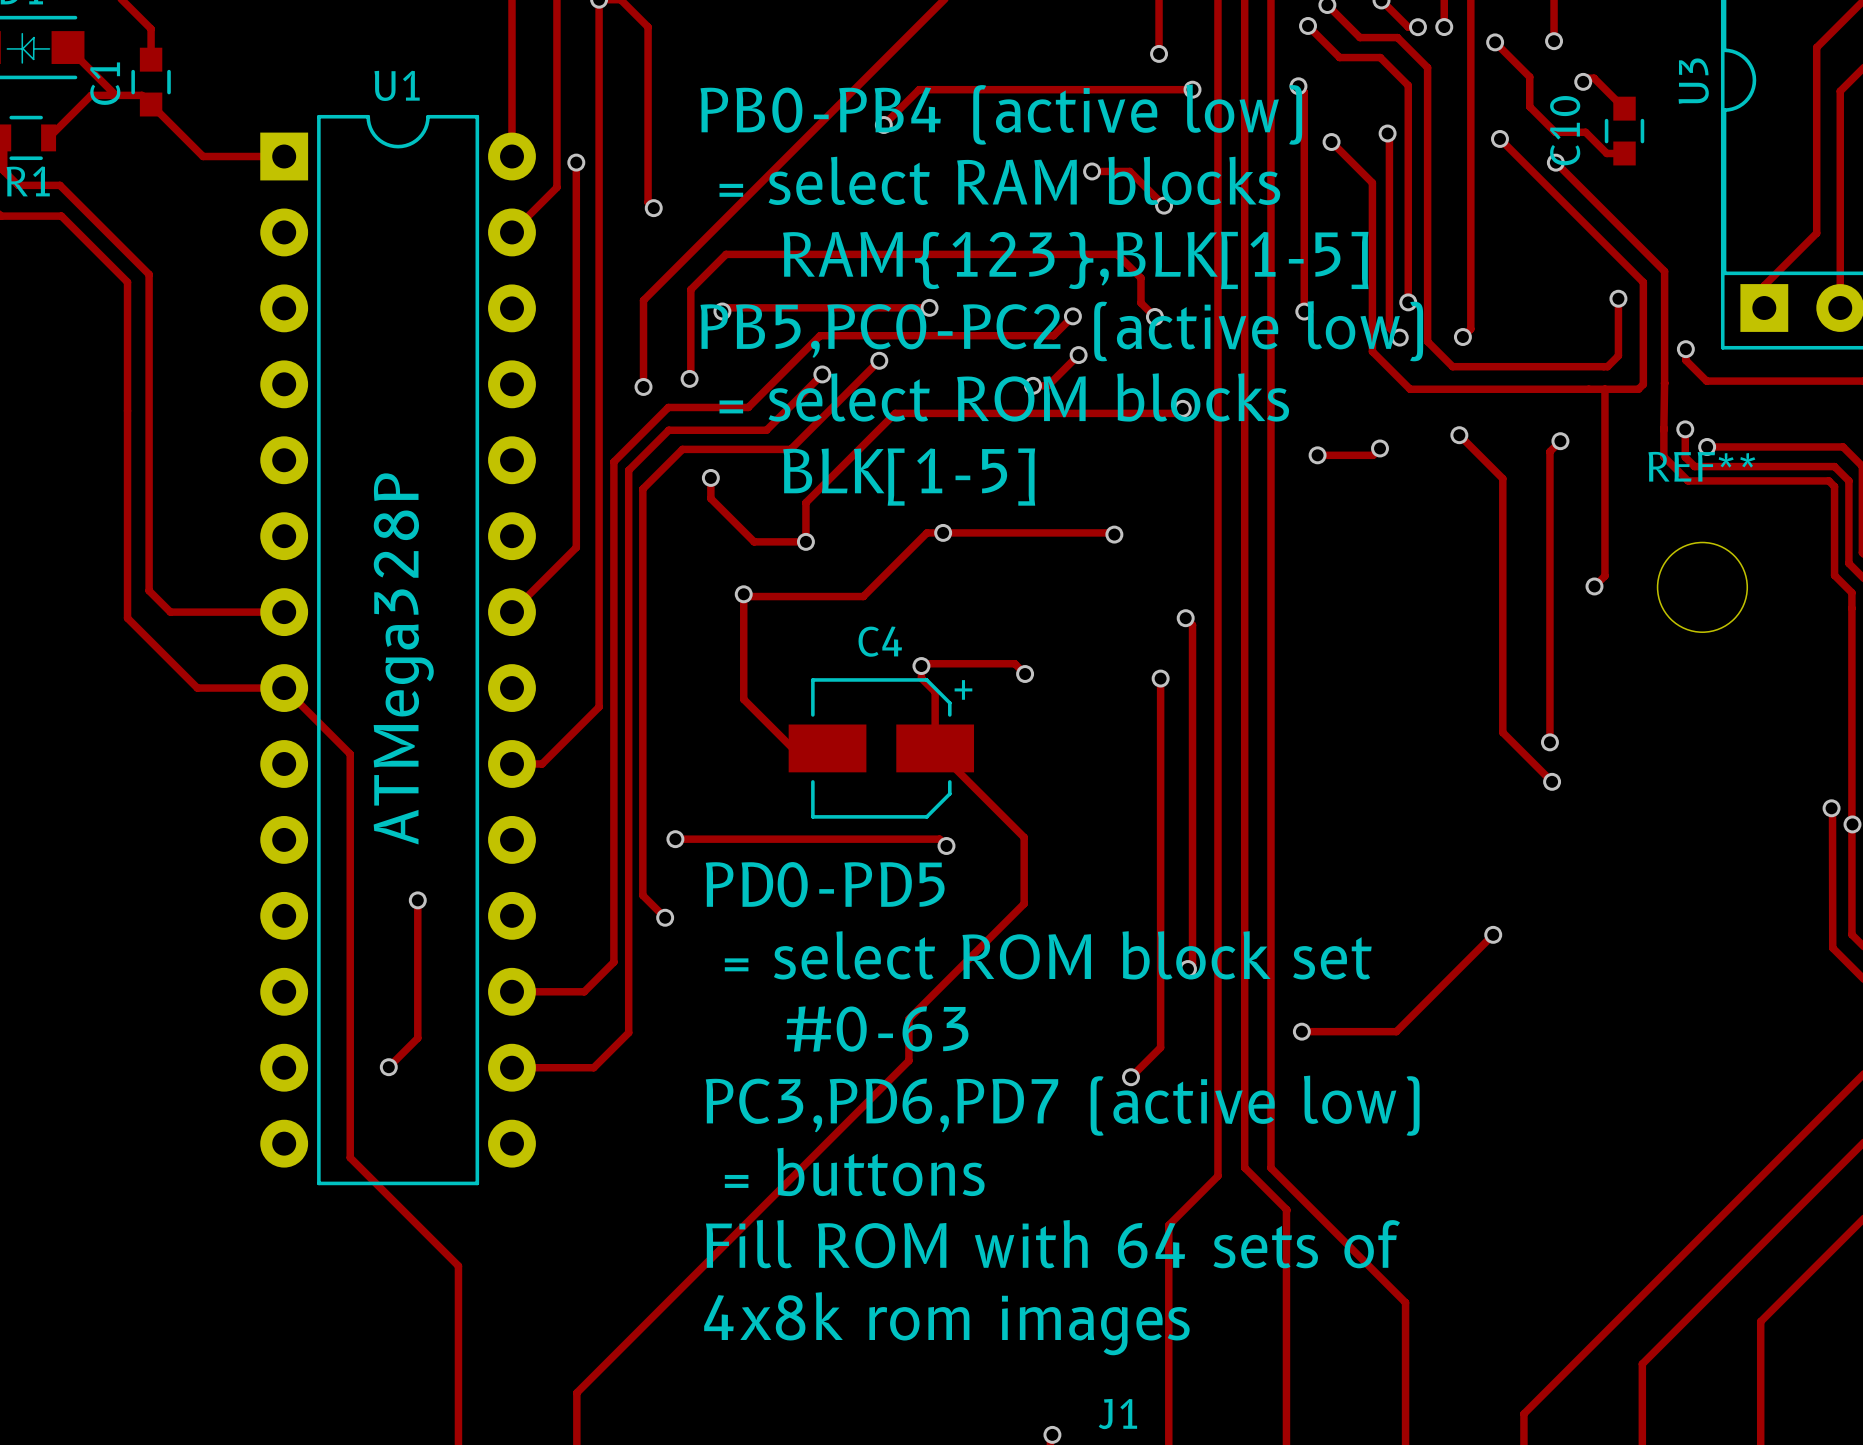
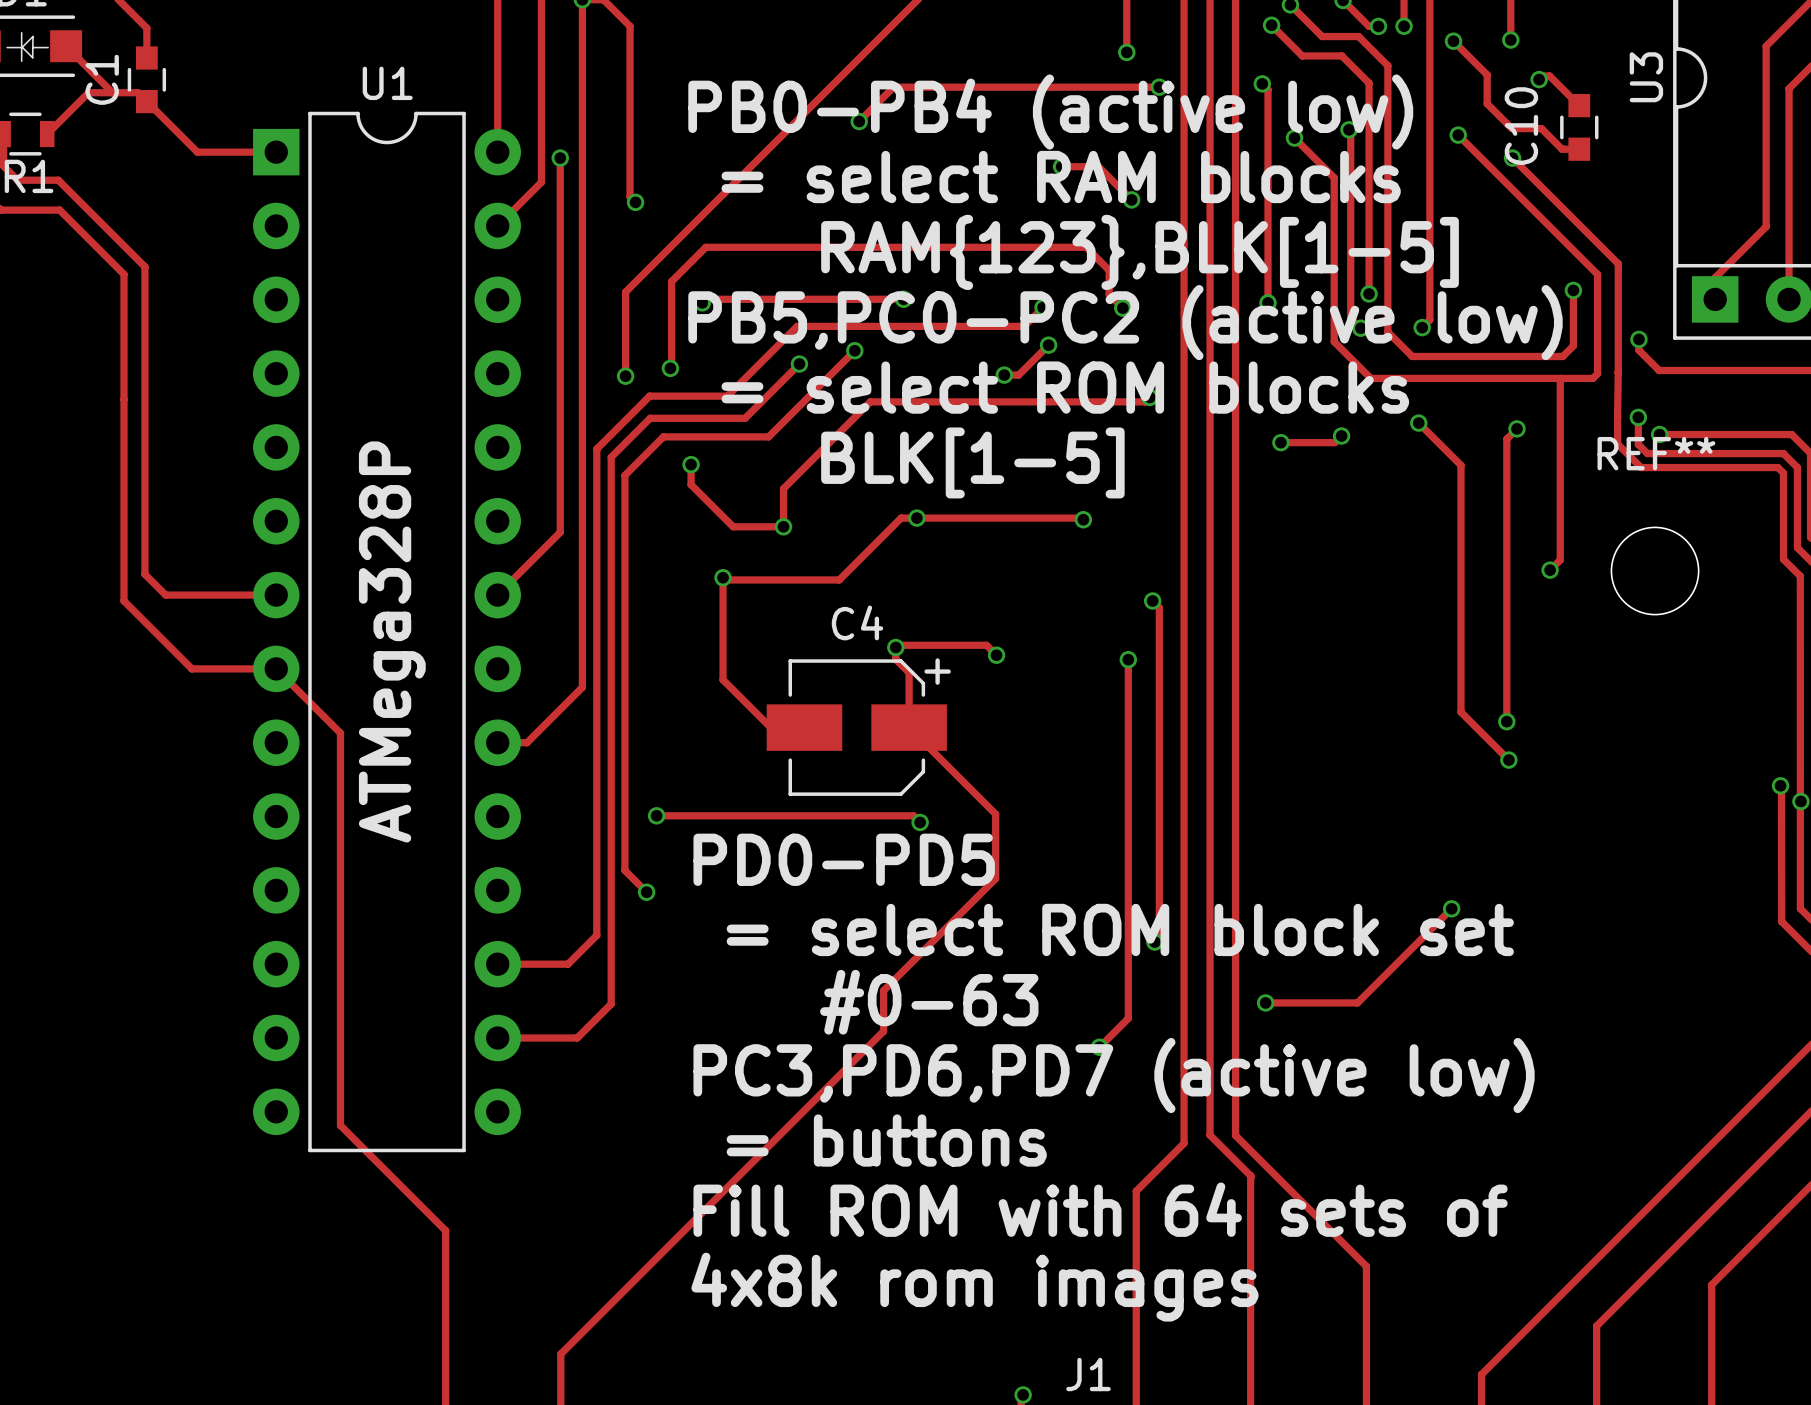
track: (417, 900) (417, 1038) (388, 1067) -> none
via: (417, 900) -> none
via: (388, 1067) -> none

